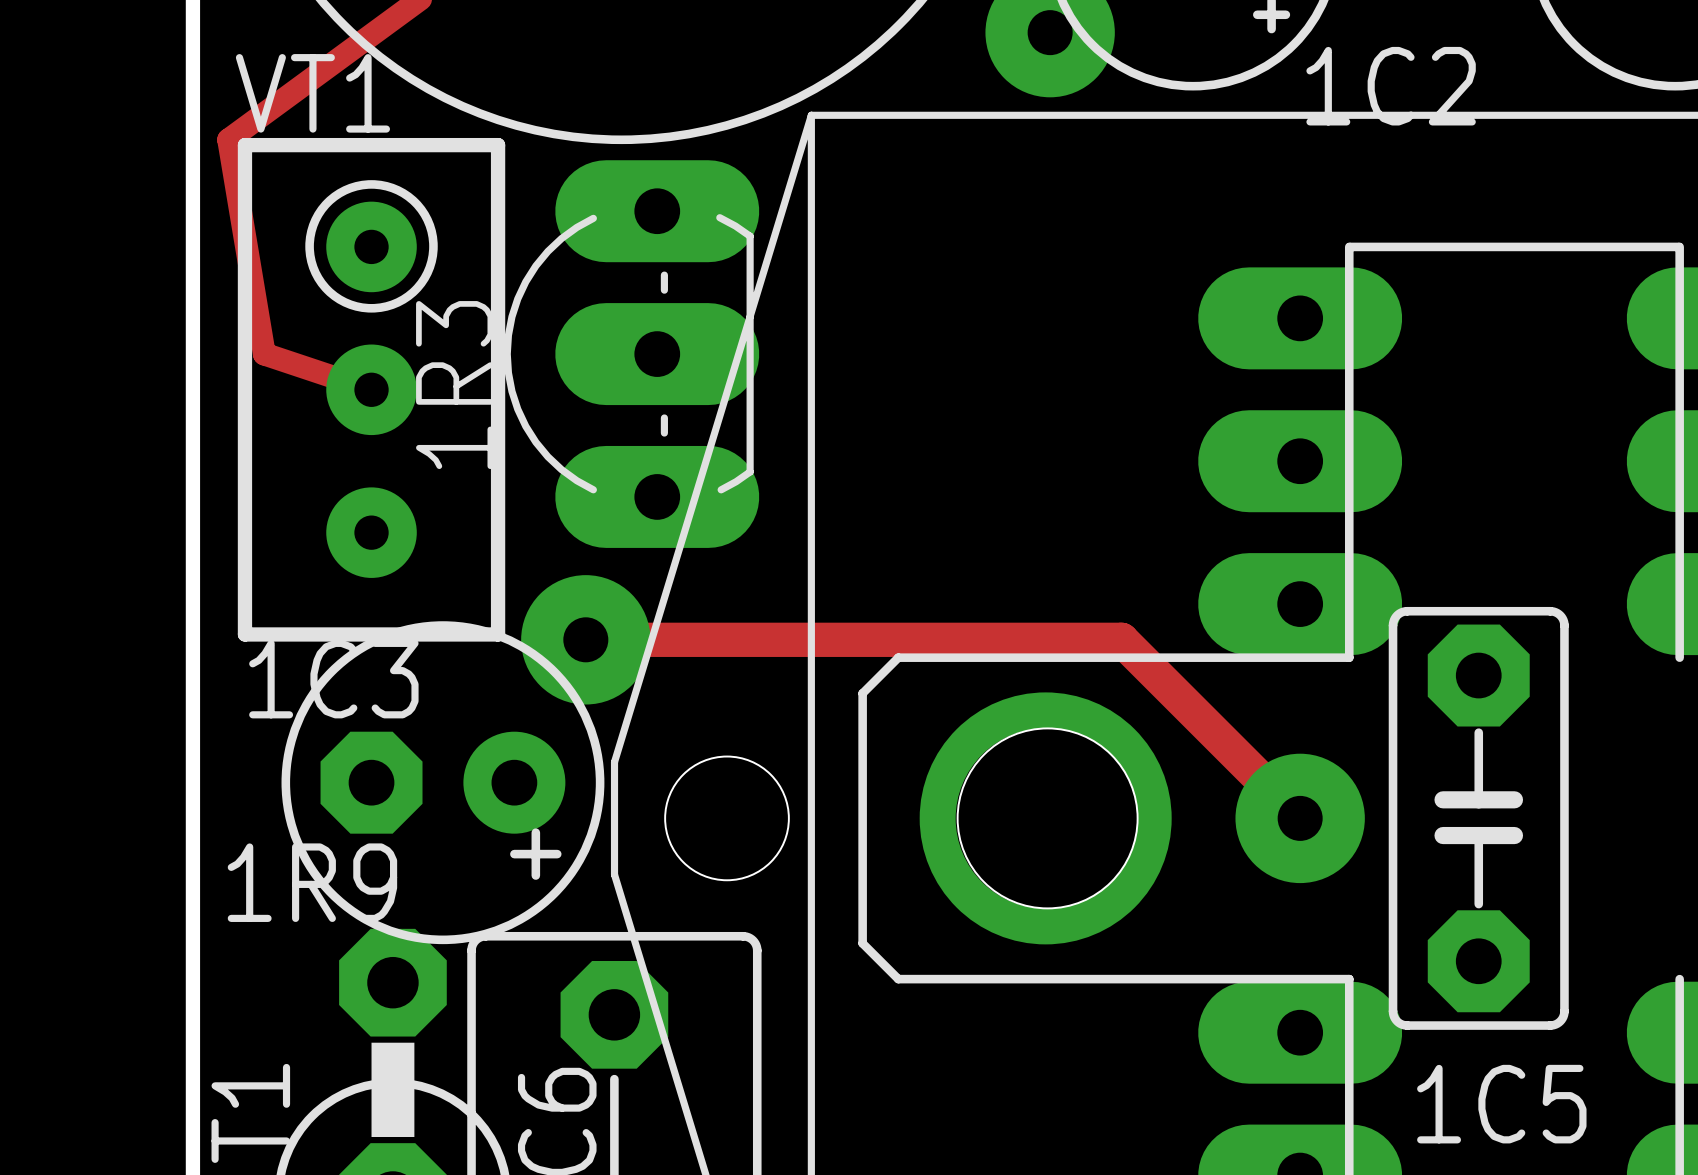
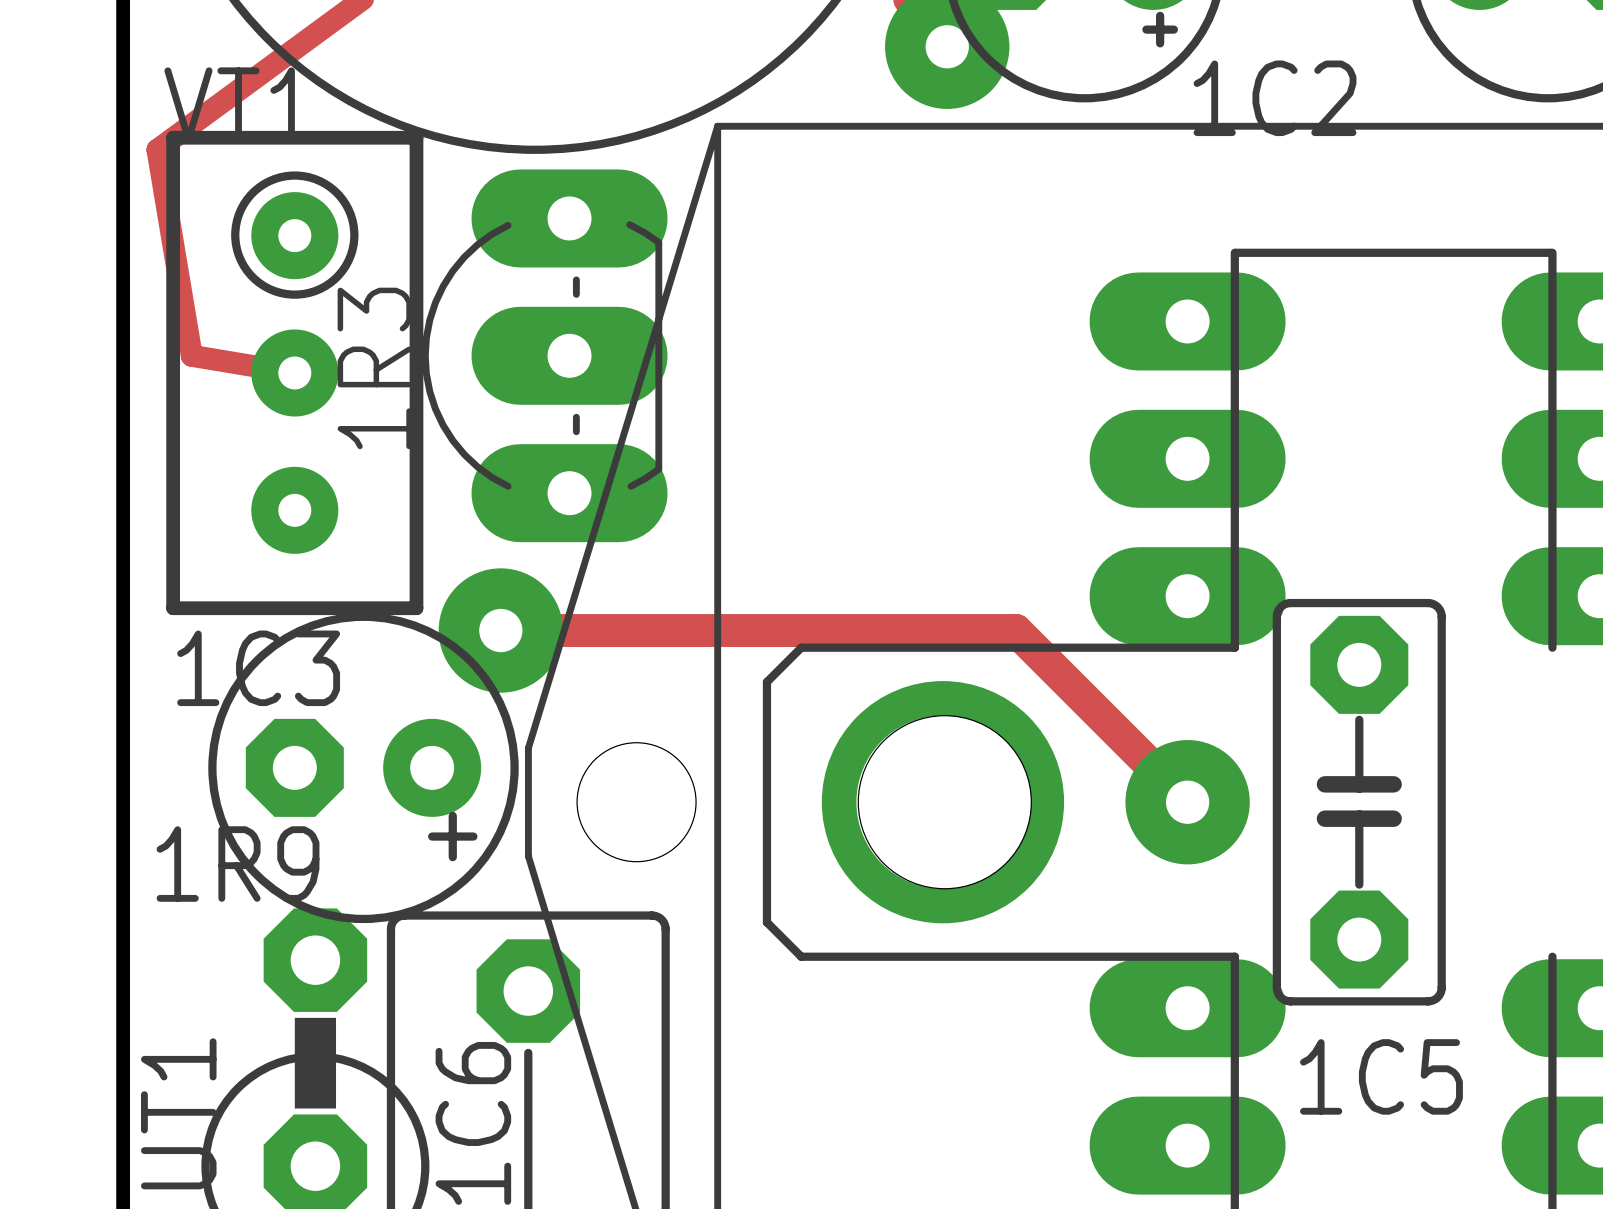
track: (264, 354) (371, 389) -> (191, 355) (294, 372)
1R3 position: (371, 389) -> (294, 372)

